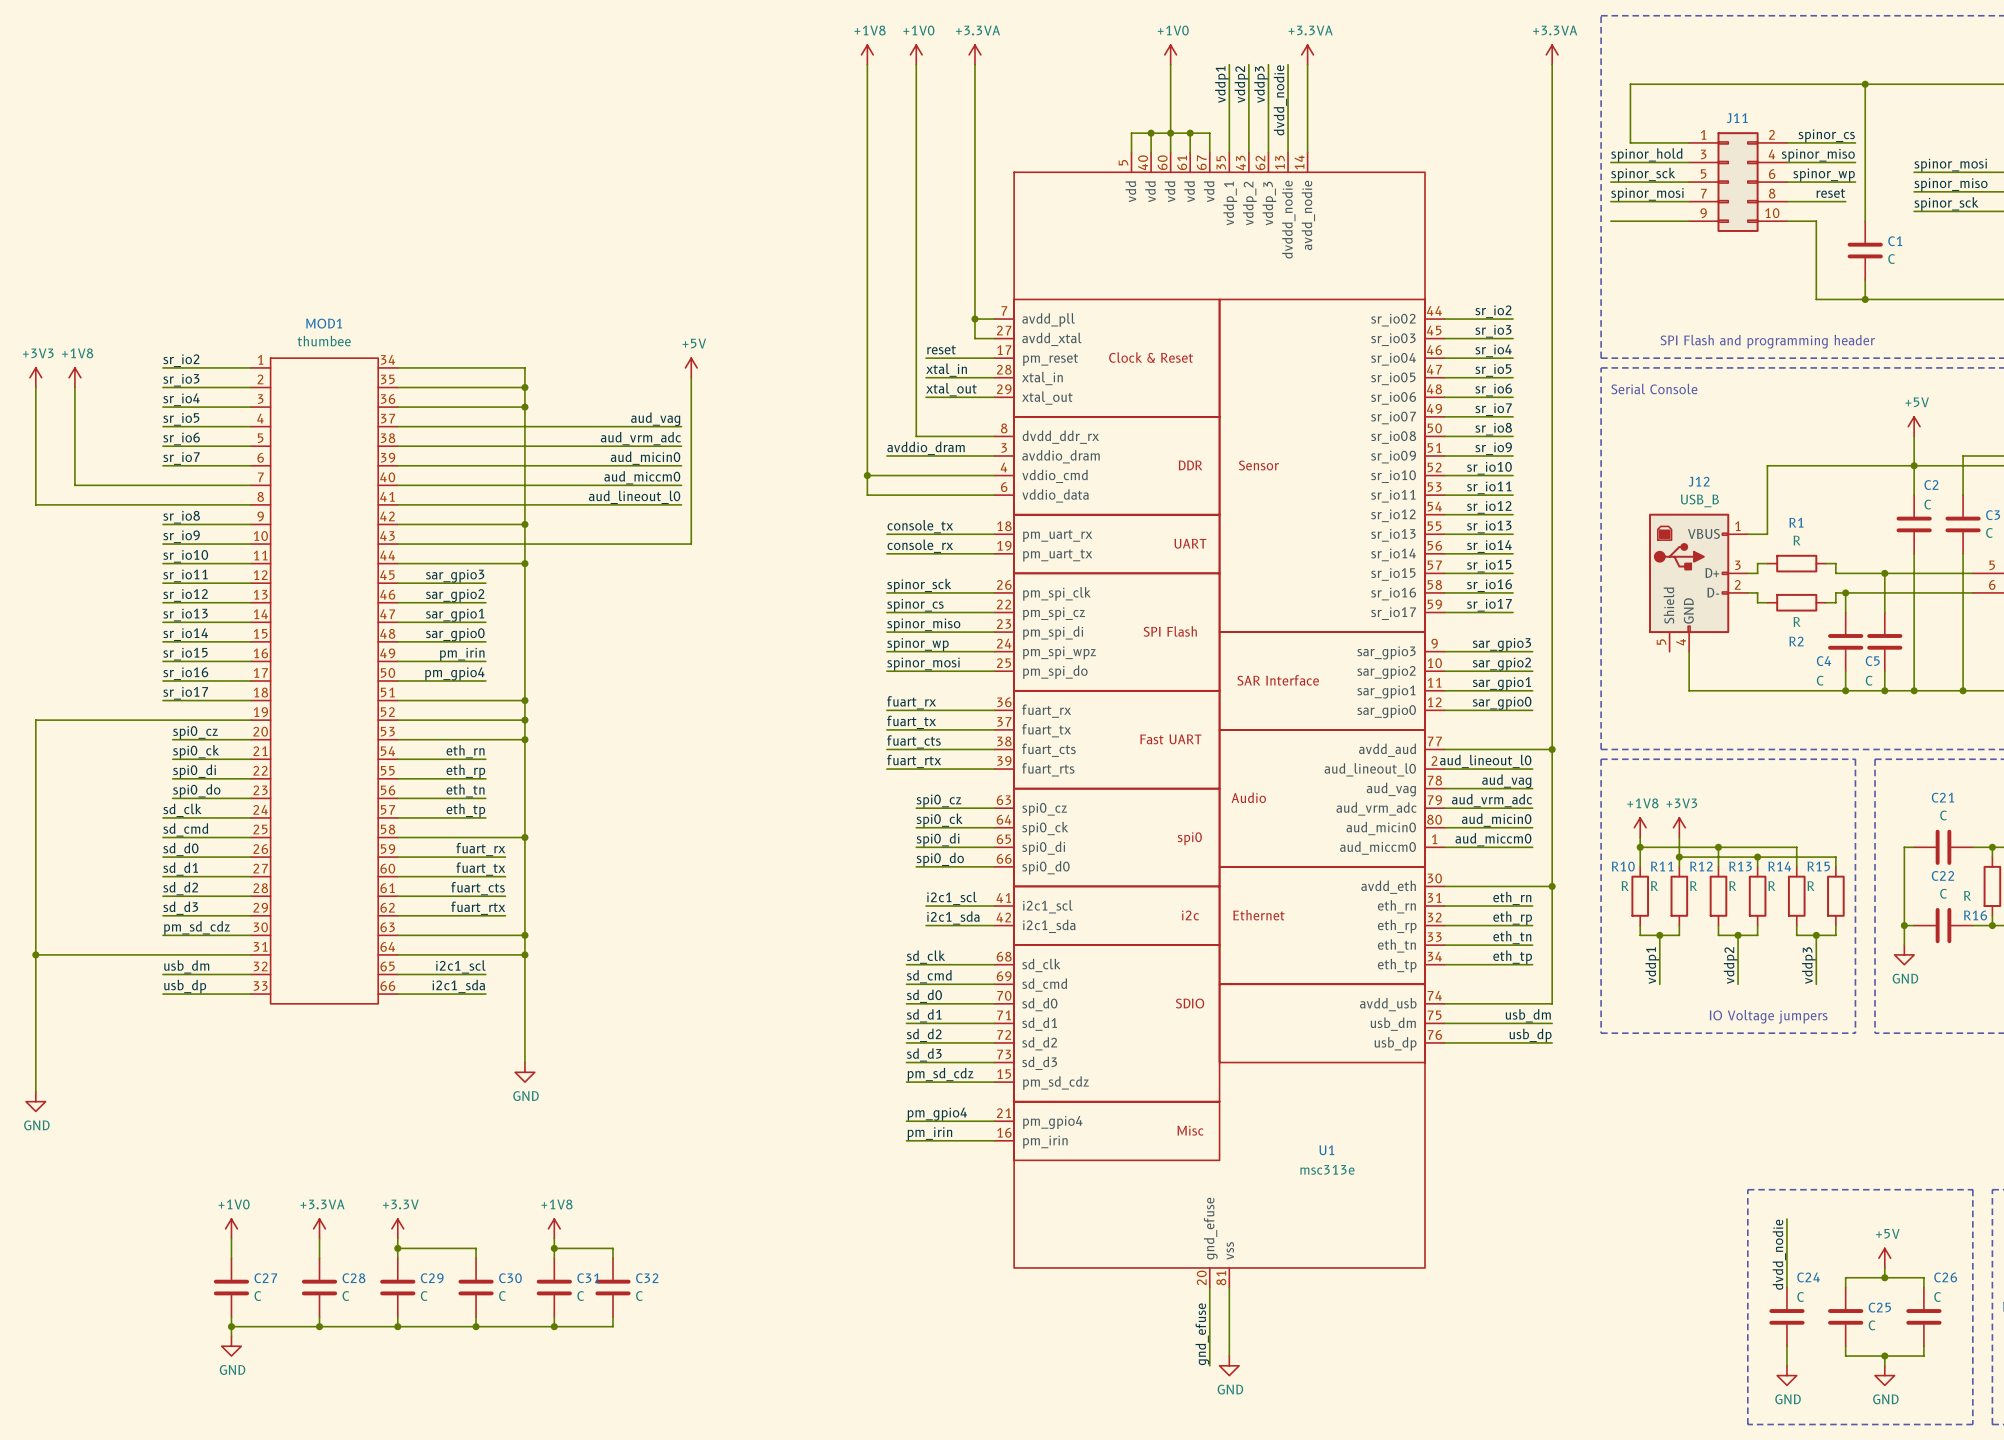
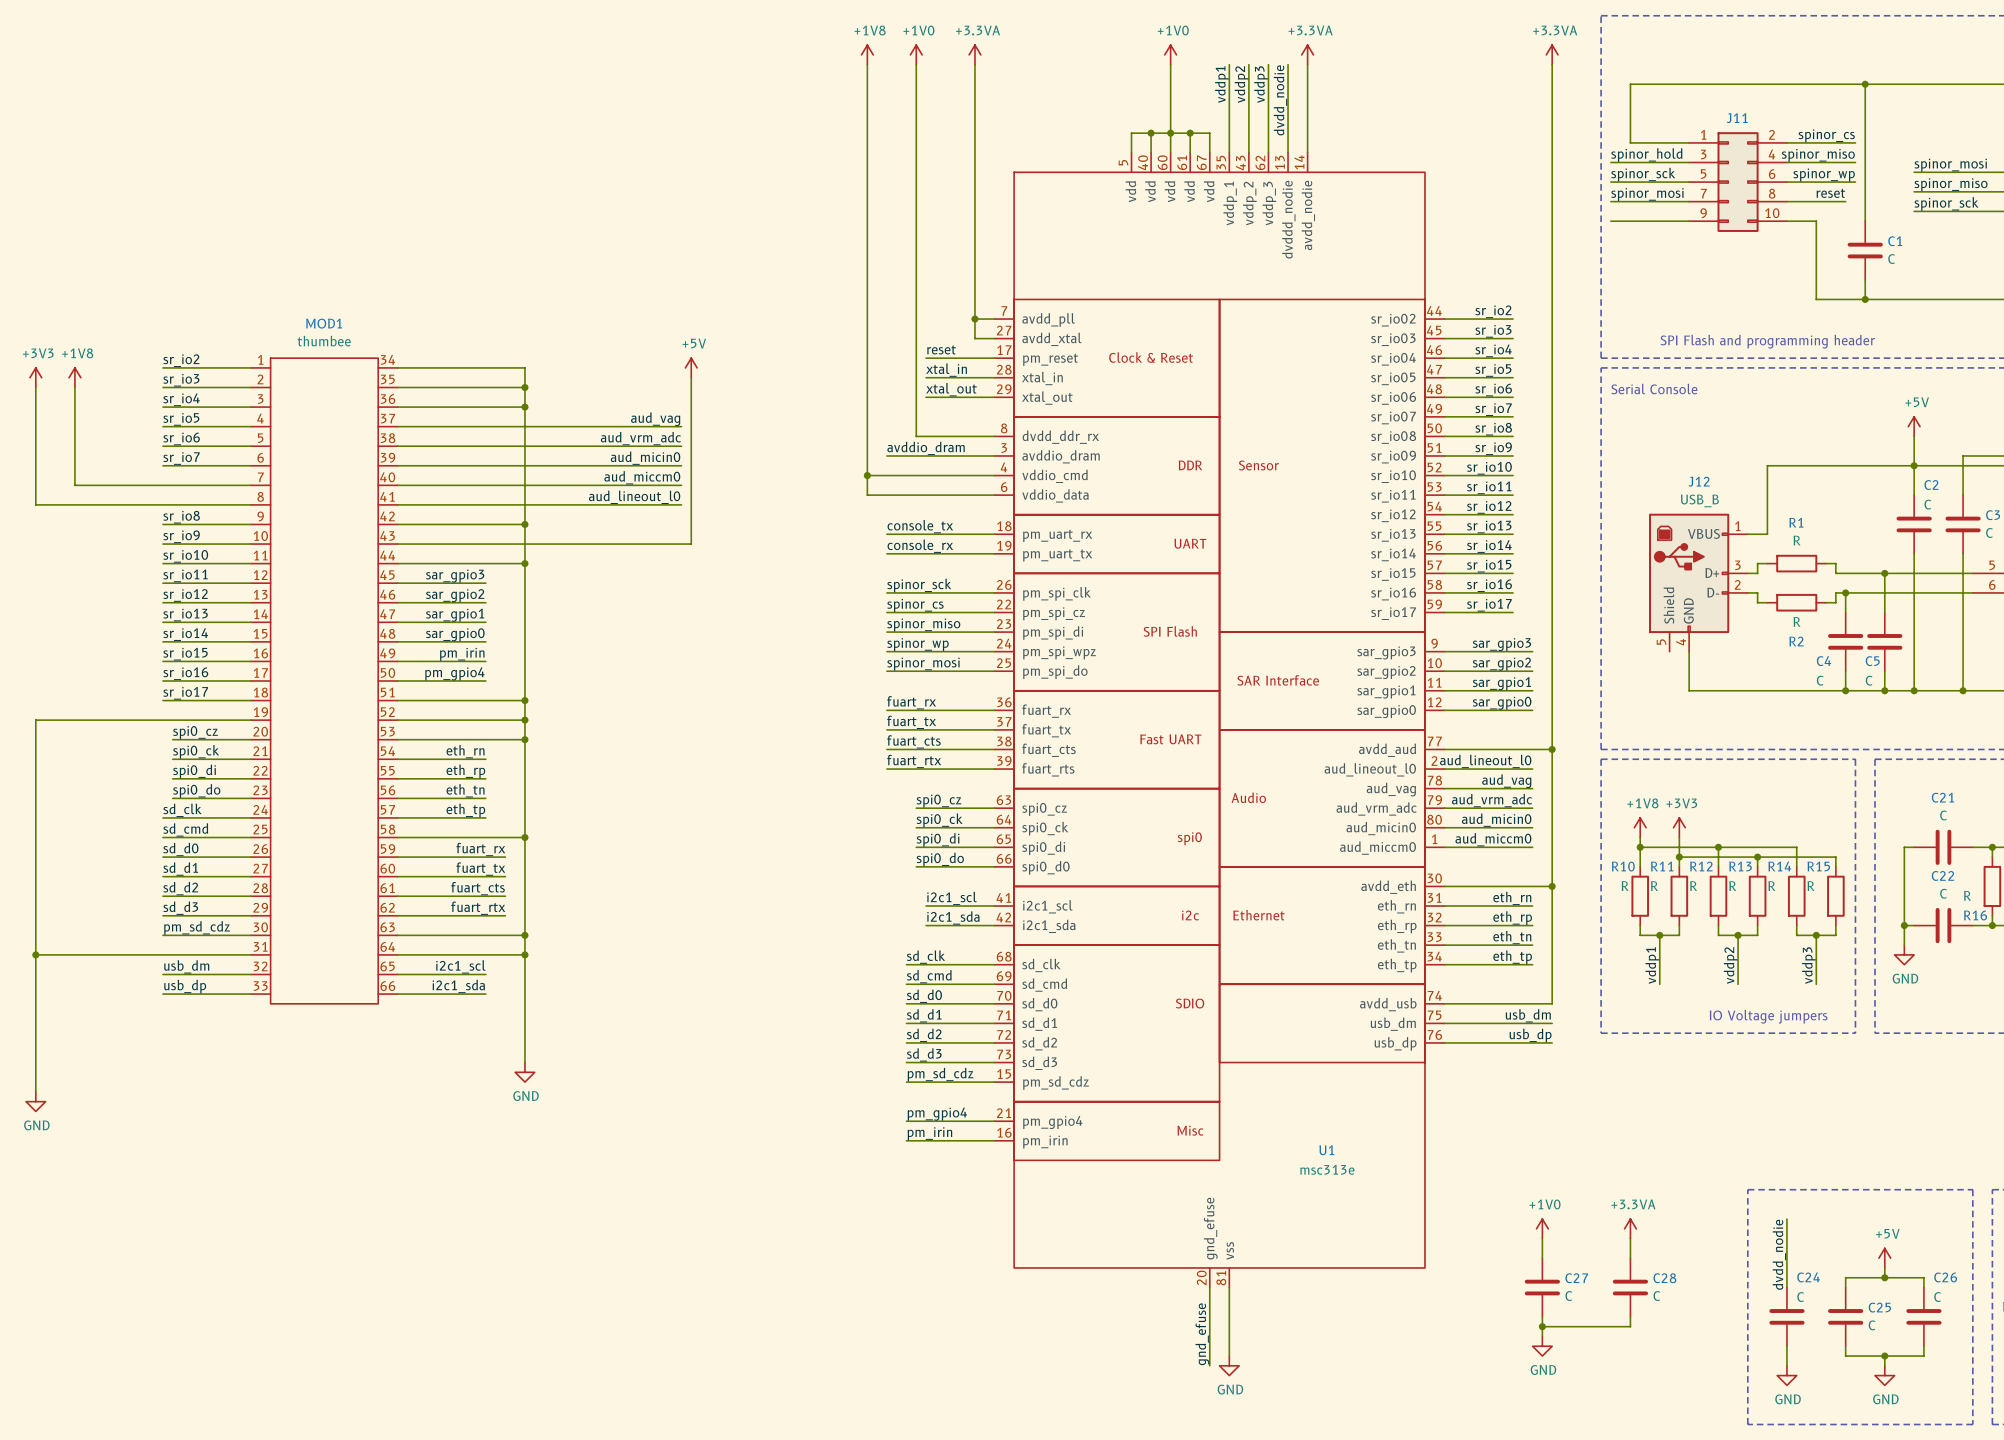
power symbol: +1V0 (231, 1228) -> none
power symbol: +3.3VA (319, 1228) -> none
power symbol: +3.3V (397, 1228) -> none
power symbol: +1V8 (554, 1228) -> none
power symbol: none -> +1V0 (1542, 1228)
power symbol: none -> +3.3VA (1630, 1228)
wire: (231, 1238) (231, 1258) -> none
wire: (319, 1238) (319, 1258) -> none
wire: (397, 1238) (397, 1258) -> none
wire: (554, 1238) (554, 1258) -> none
wire: none -> (1542, 1238) (1542, 1258)
wire: none -> (1630, 1238) (1630, 1258)
wire: (397, 1248) (476, 1248) (476, 1258) -> none
junction: (397, 1248) -> none
wire: (554, 1248) (613, 1248) (613, 1258) -> none
junction: (554, 1248) -> none
C27 position: (231, 1287) -> (1542, 1287)
C28 position: (319, 1287) -> (1630, 1287)
C29: C (397, 1287) -> none
C30: C (476, 1287) -> none
C31: C (554, 1287) -> none
C32: C (613, 1287) -> none
wire: (231, 1316) (231, 1336) -> none
wire: (319, 1316) (319, 1326) -> none
wire: (397, 1316) (397, 1326) -> none
wire: (476, 1316) (476, 1326) -> none
wire: (554, 1316) (554, 1326) -> none
wire: (613, 1316) (613, 1326) (231, 1326) -> none
wire: none -> (1542, 1316) (1542, 1336)
wire: none -> (1630, 1316) (1630, 1326) (1542, 1326)
junction: (231, 1326) -> none
junction: (319, 1326) -> none
junction: (397, 1326) -> none
junction: (476, 1326) -> none
junction: (554, 1326) -> none
junction: none -> (1542, 1326)
power symbol: GND (231, 1346) -> none
power symbol: none -> GND (1542, 1346)

